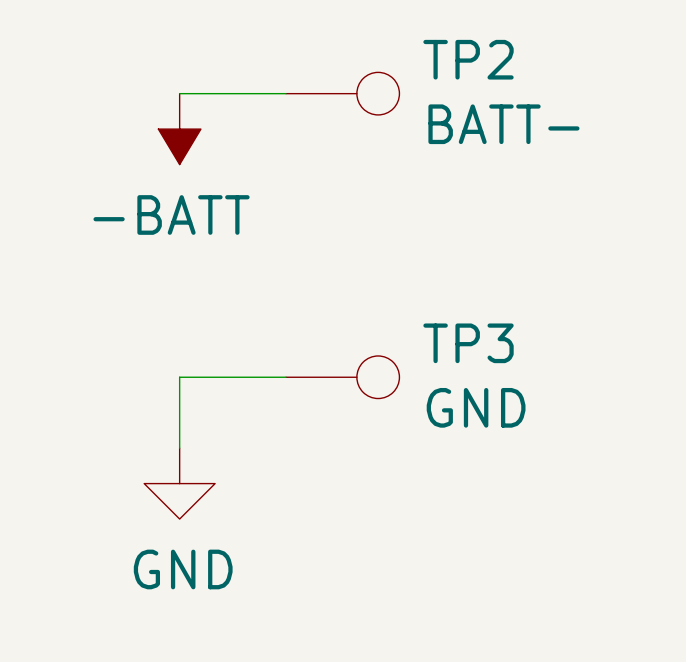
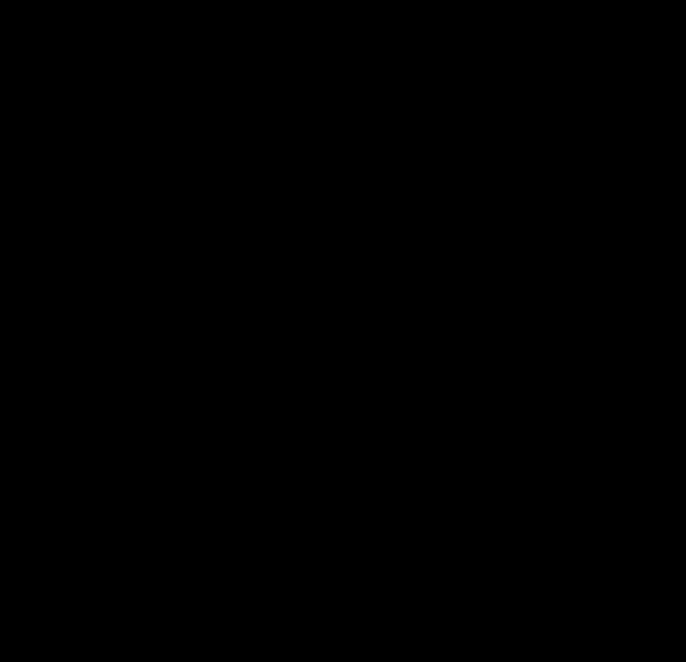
wire: (179, 93) (286, 93) -> none
TP2: BATT- (342, 93) -> none
power symbol: -BATT (179, 129) -> none
wire: (286, 377) (179, 377) (179, 448) -> none
TP3: GND (342, 377) -> none
power symbol: GND (179, 483) -> none

